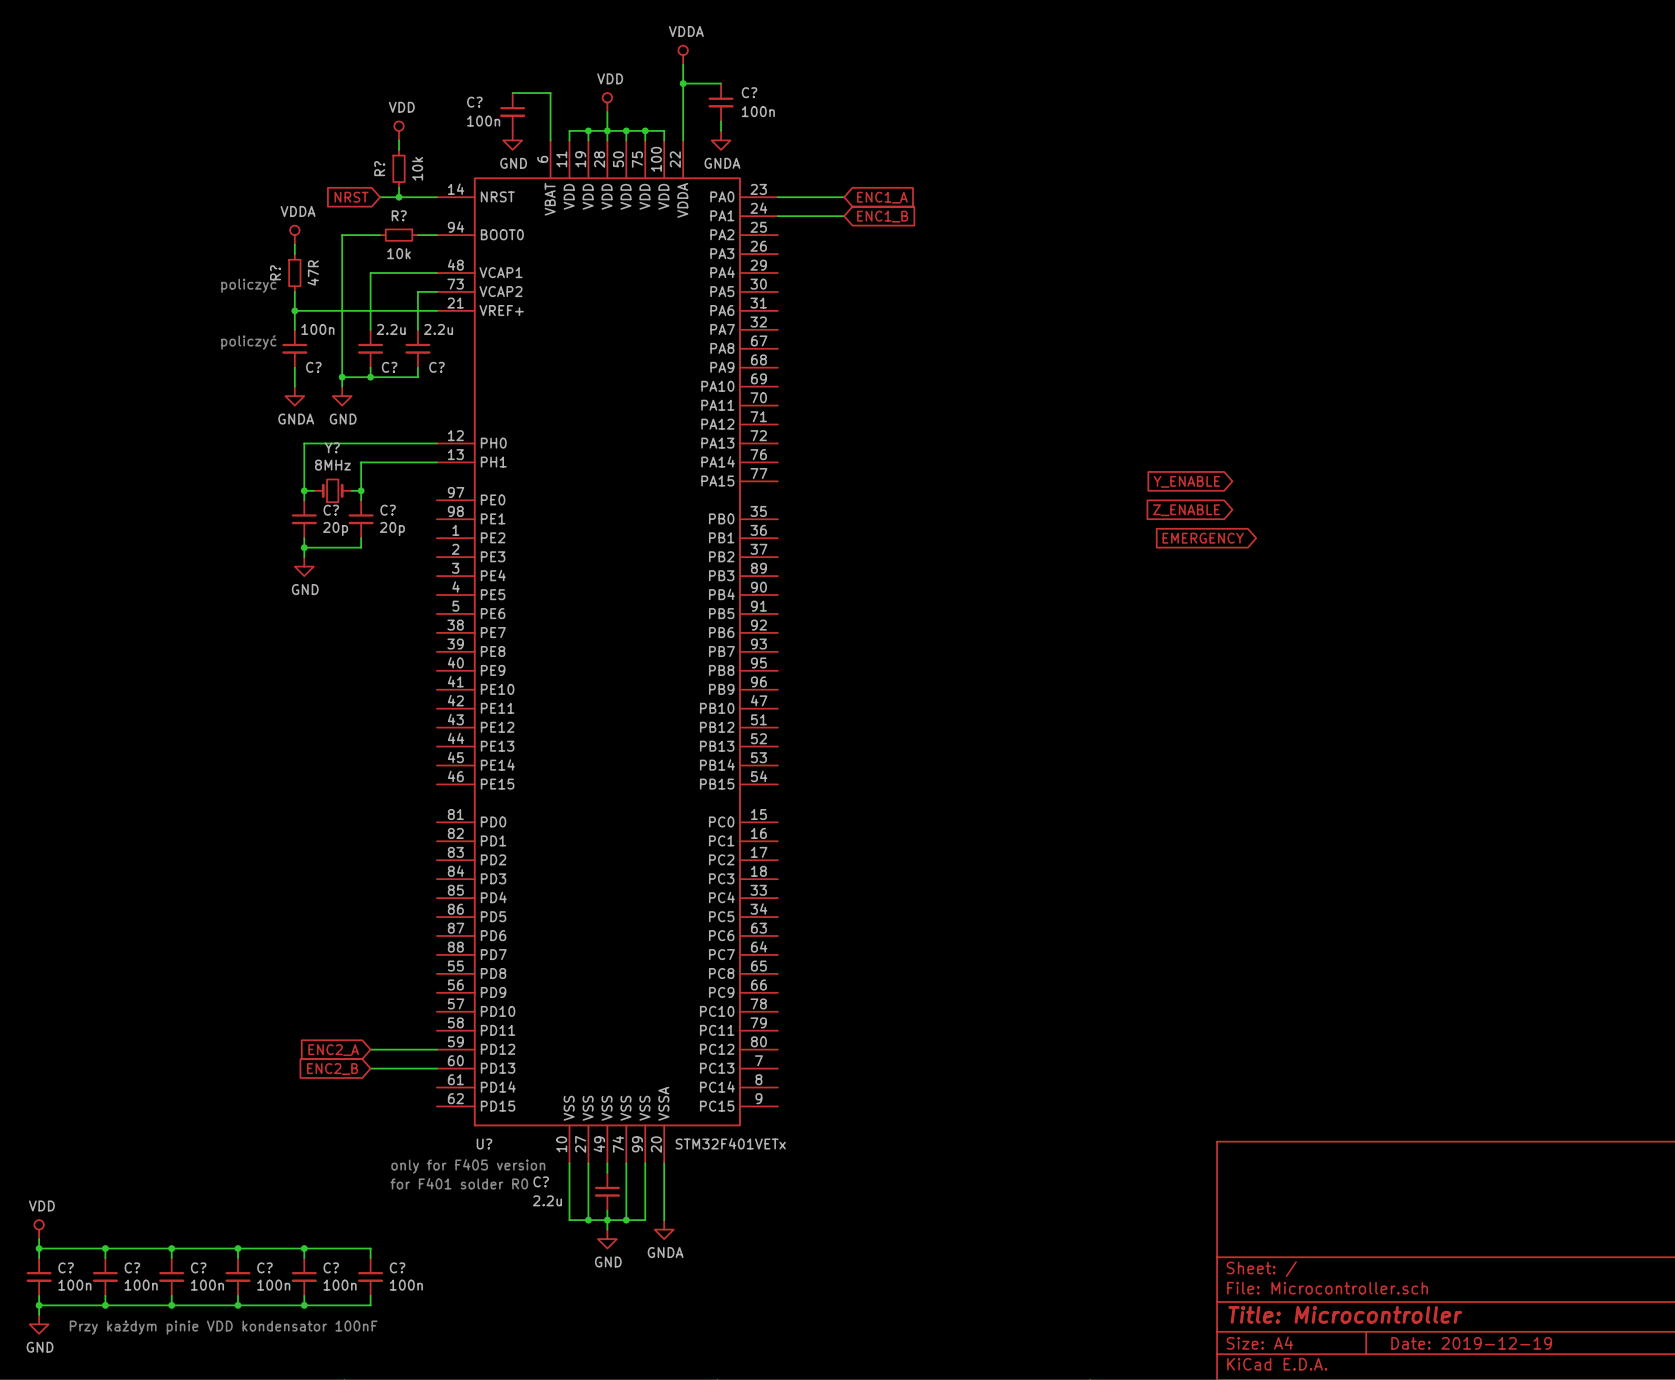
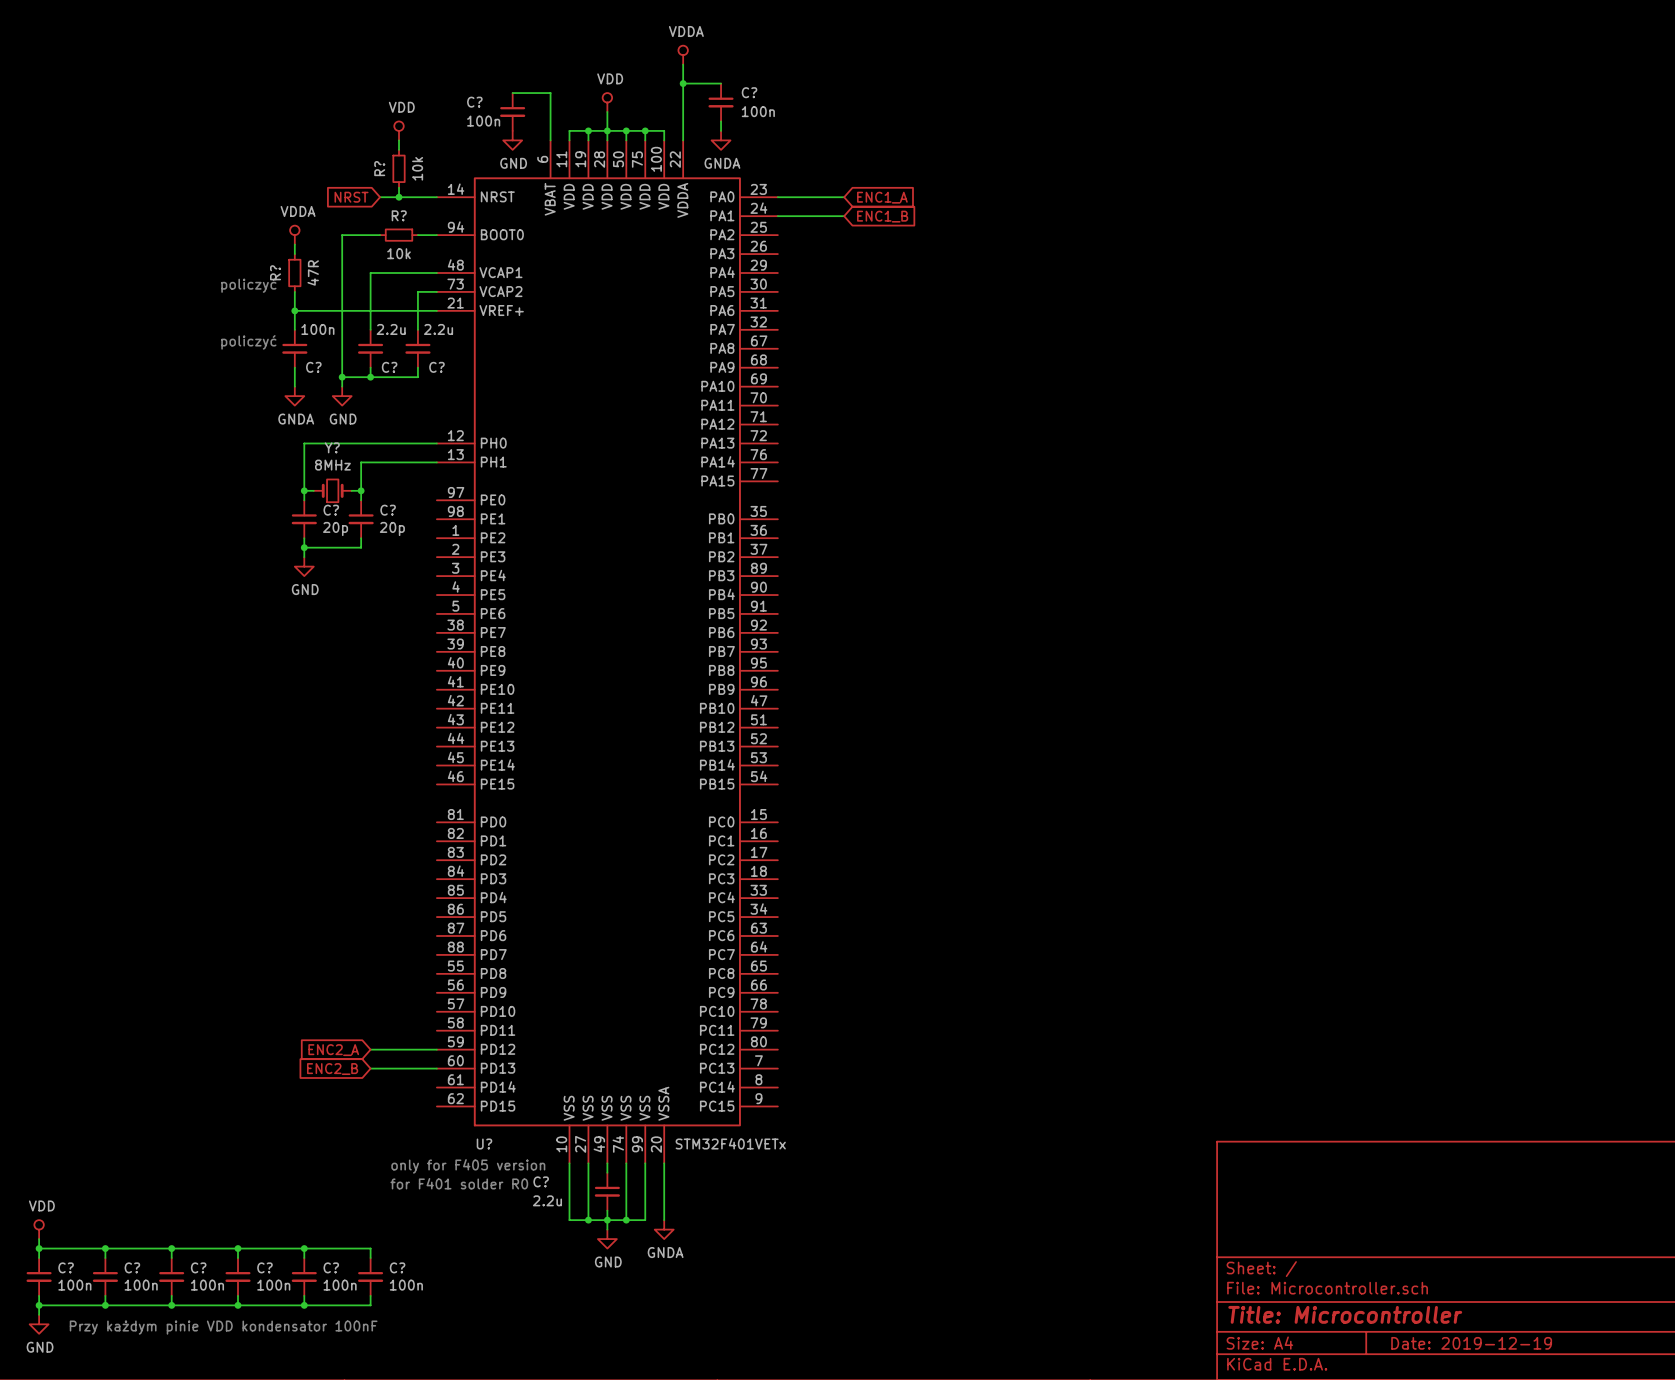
global label: Y_ENABLE (1186, 481) -> none
global label: Z_ENABLE (1186, 510) -> none
global label: EMERGENCY (1203, 538) -> none

